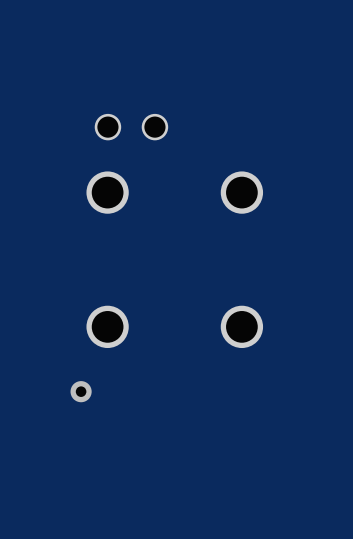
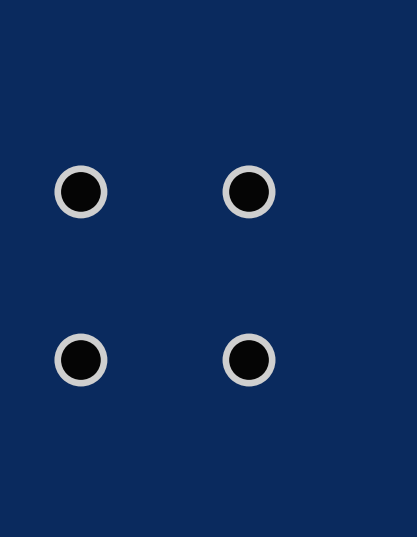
part: (107, 127) -> none
part: (154, 127) -> none
via: (81, 391) -> none

